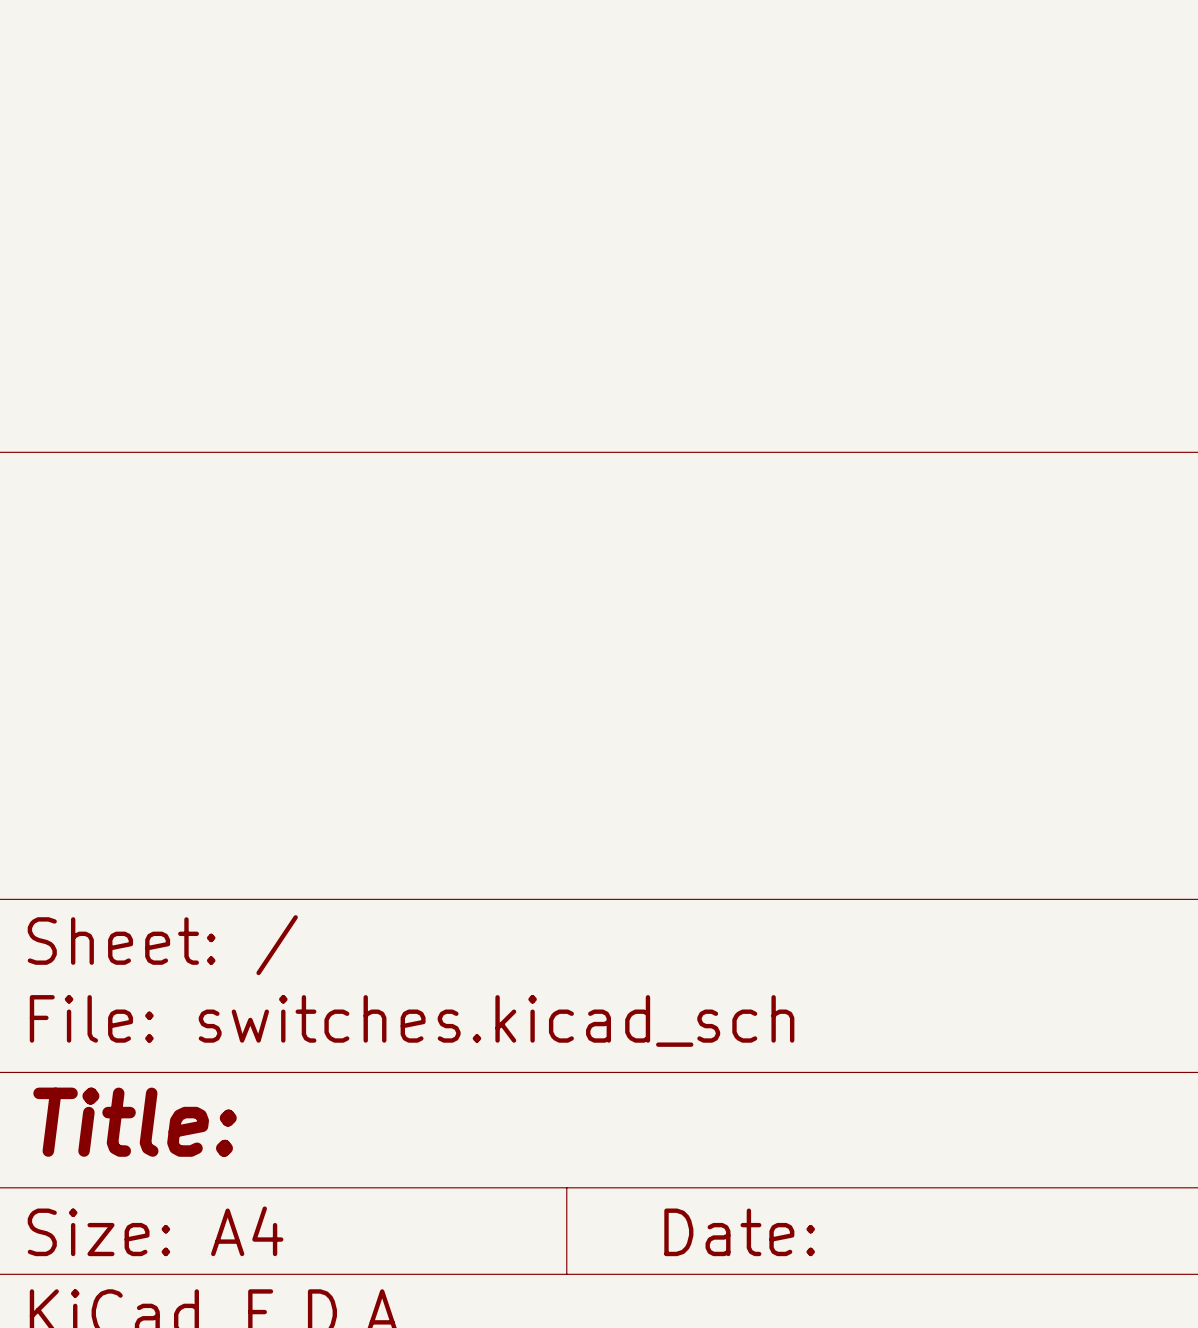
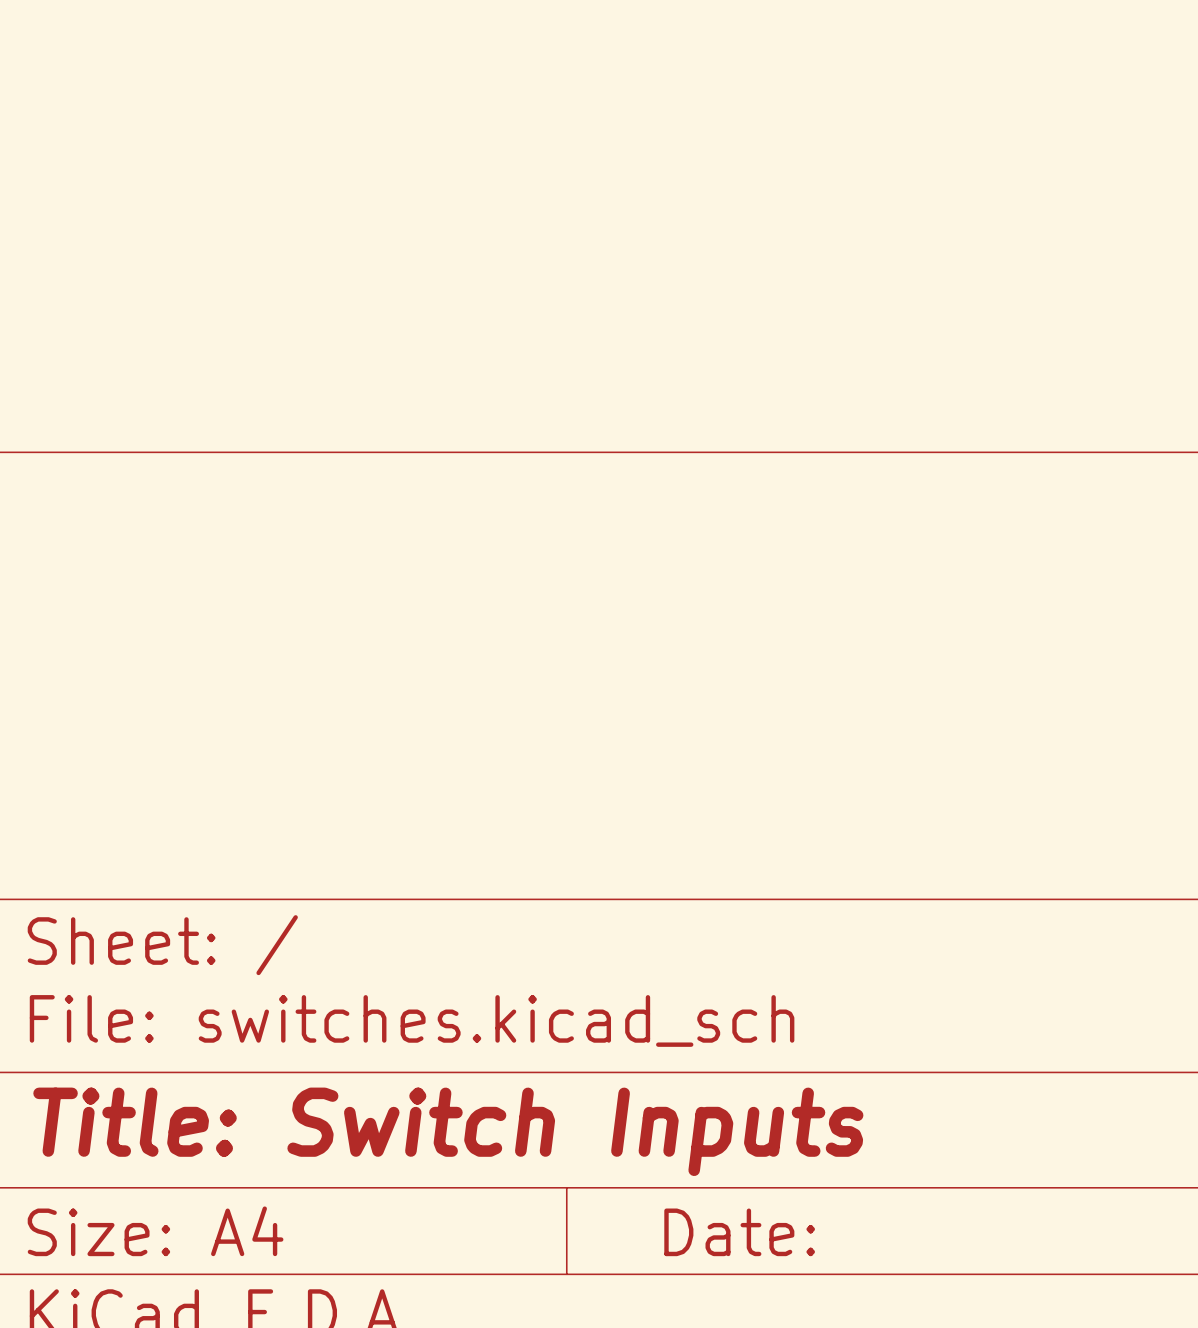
title block: Title: (135, 1122) -> Title: Switch Inputs (448, 1131)

